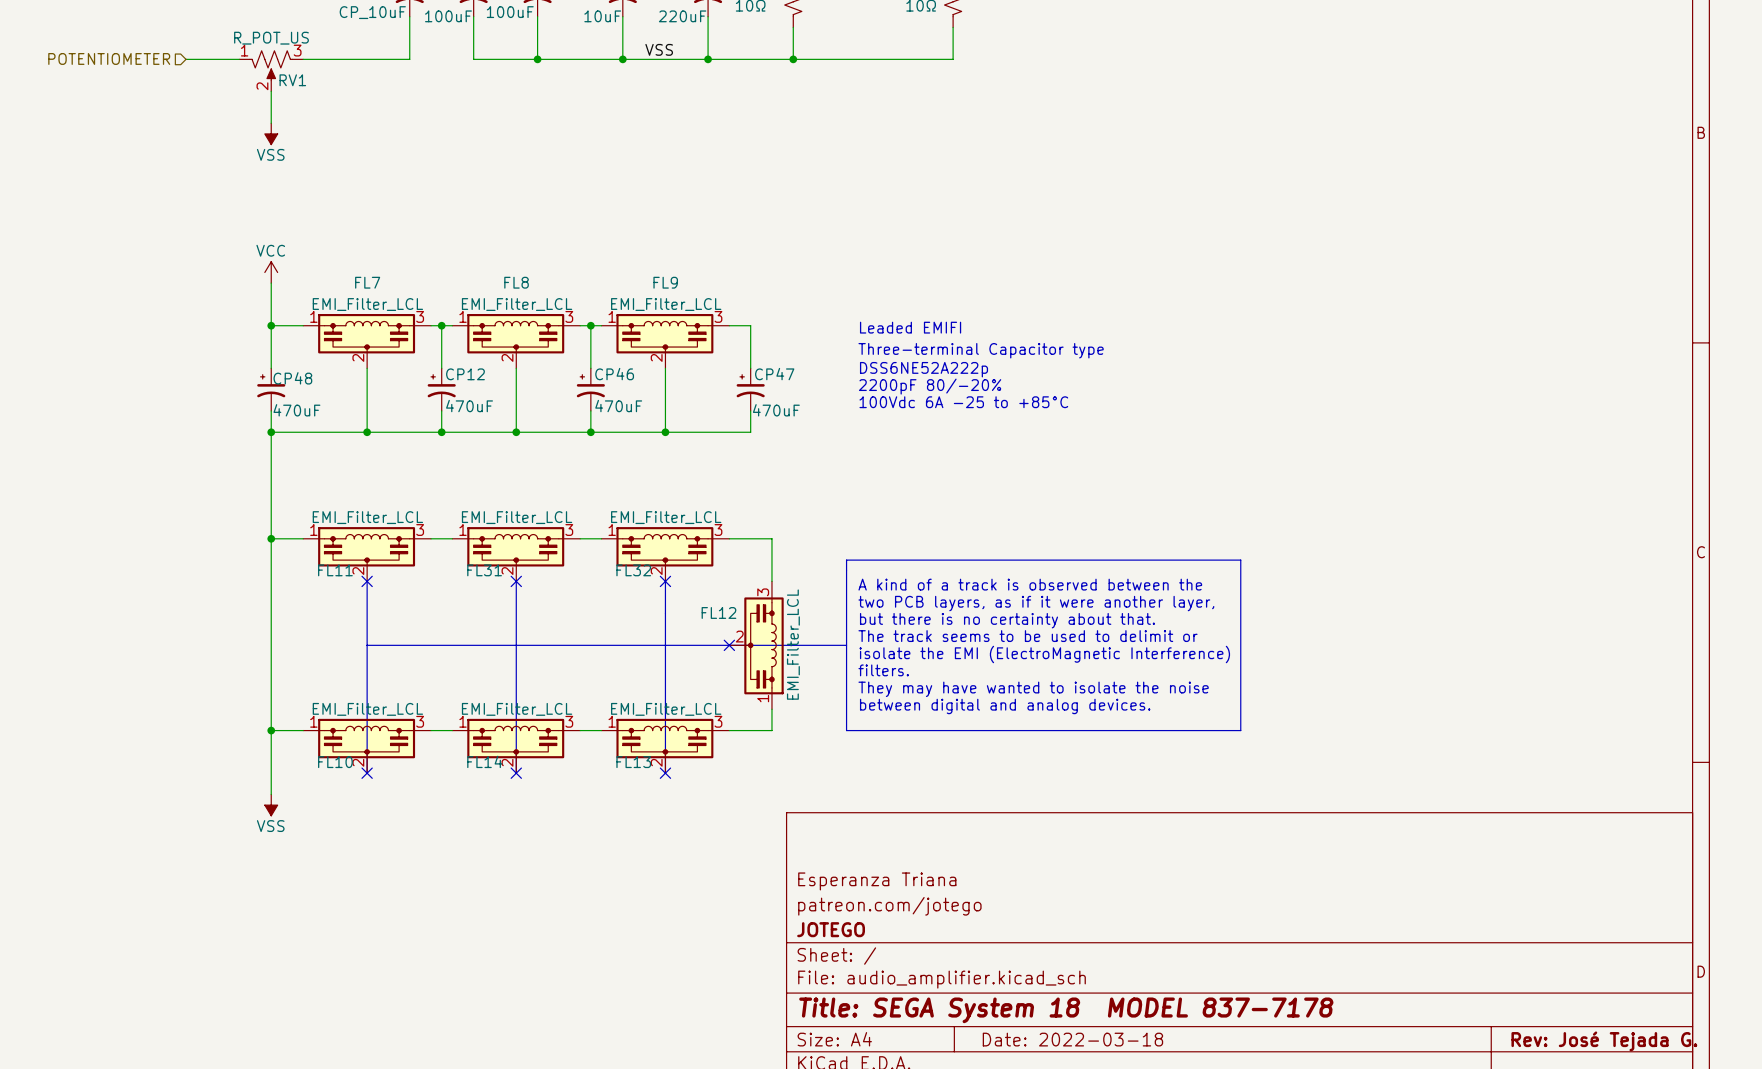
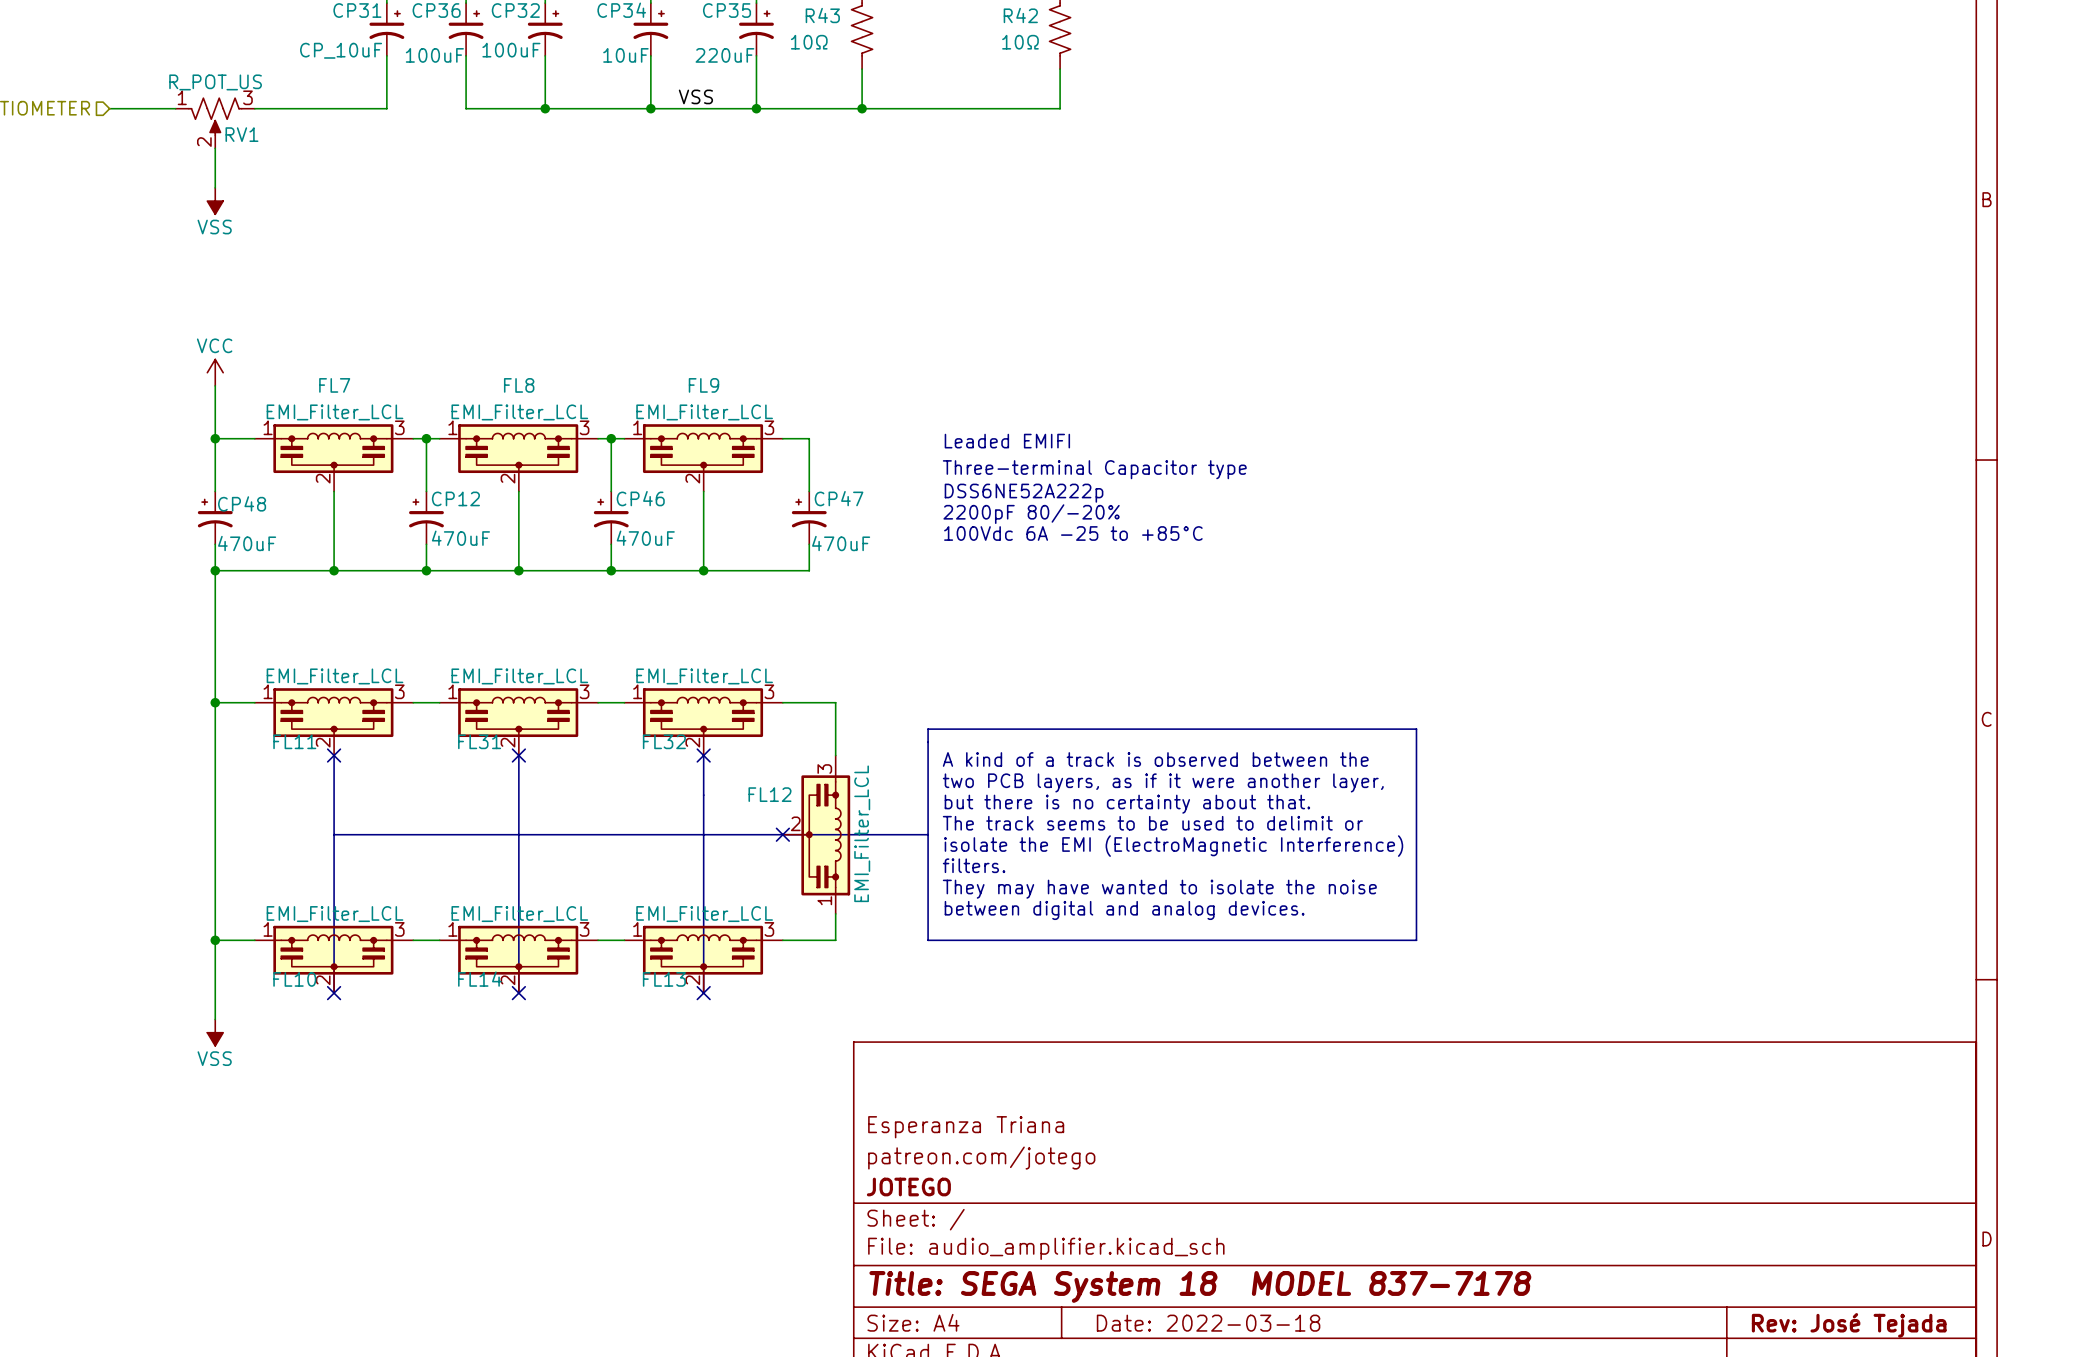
title block: Rev: José Tejada G. (1604, 1041) -> Rev: José Tejada (1849, 1325)

